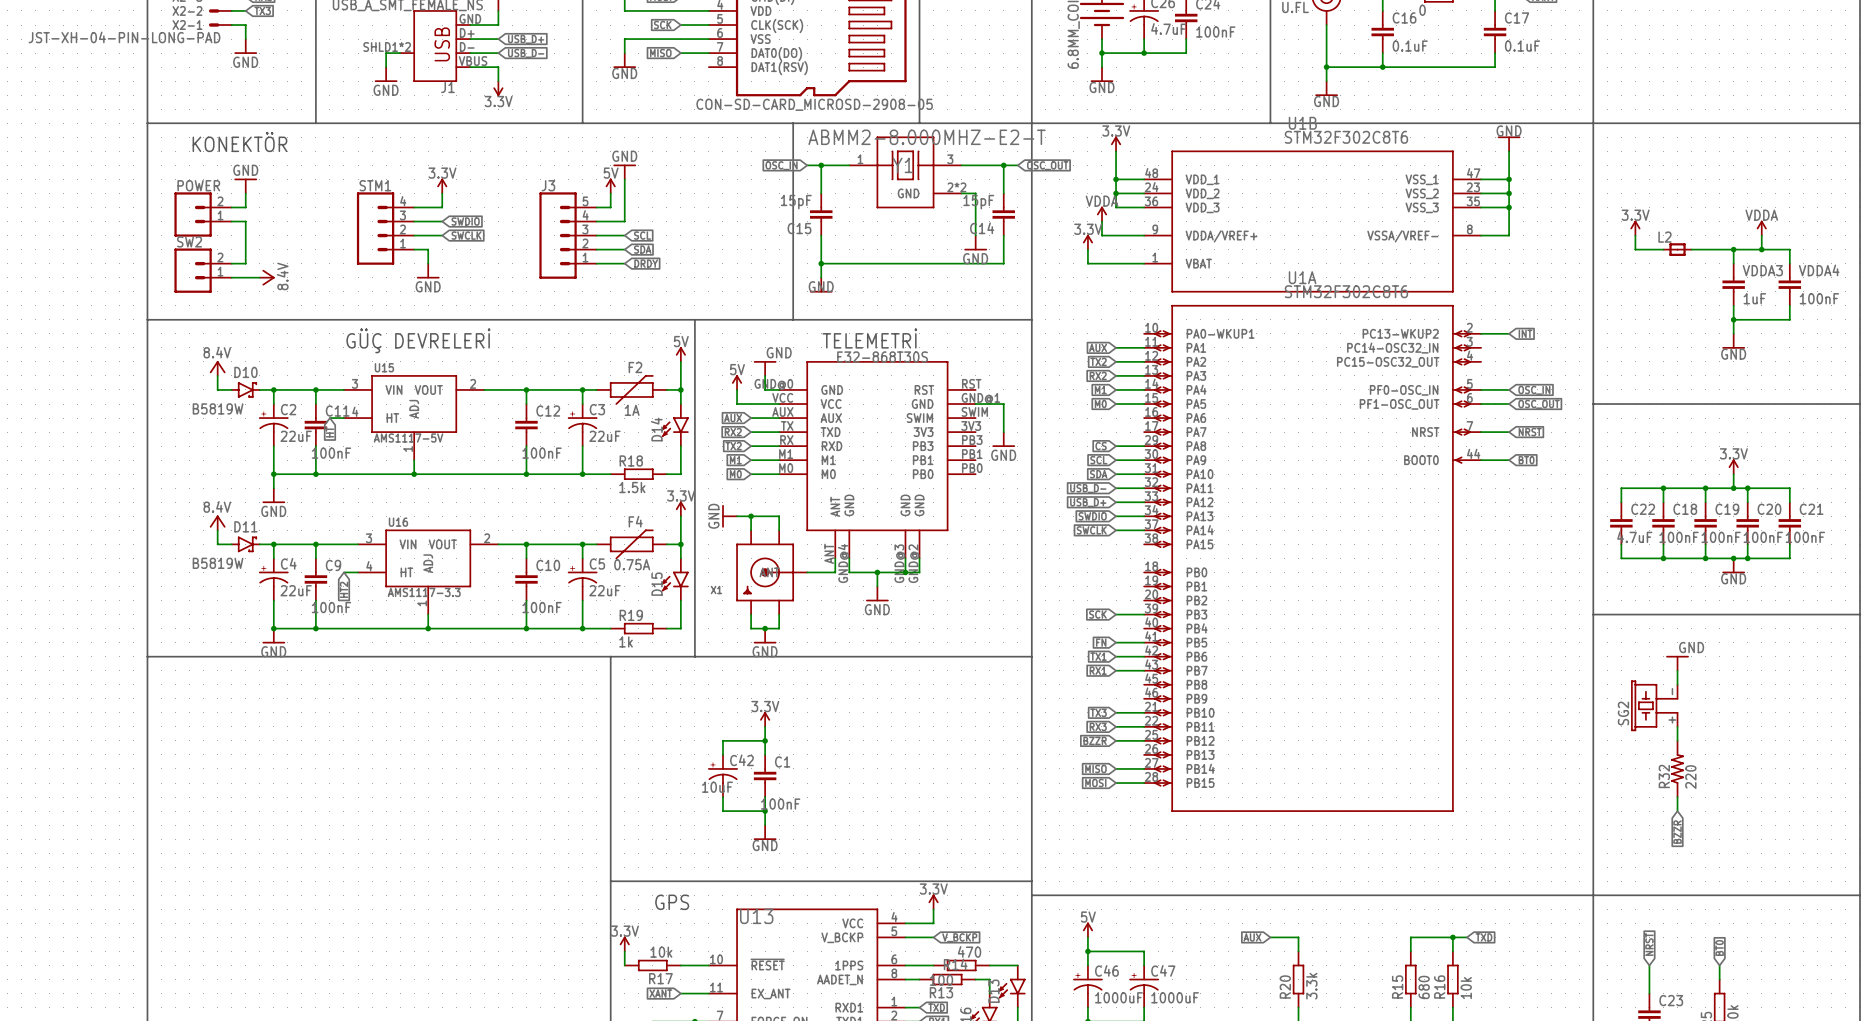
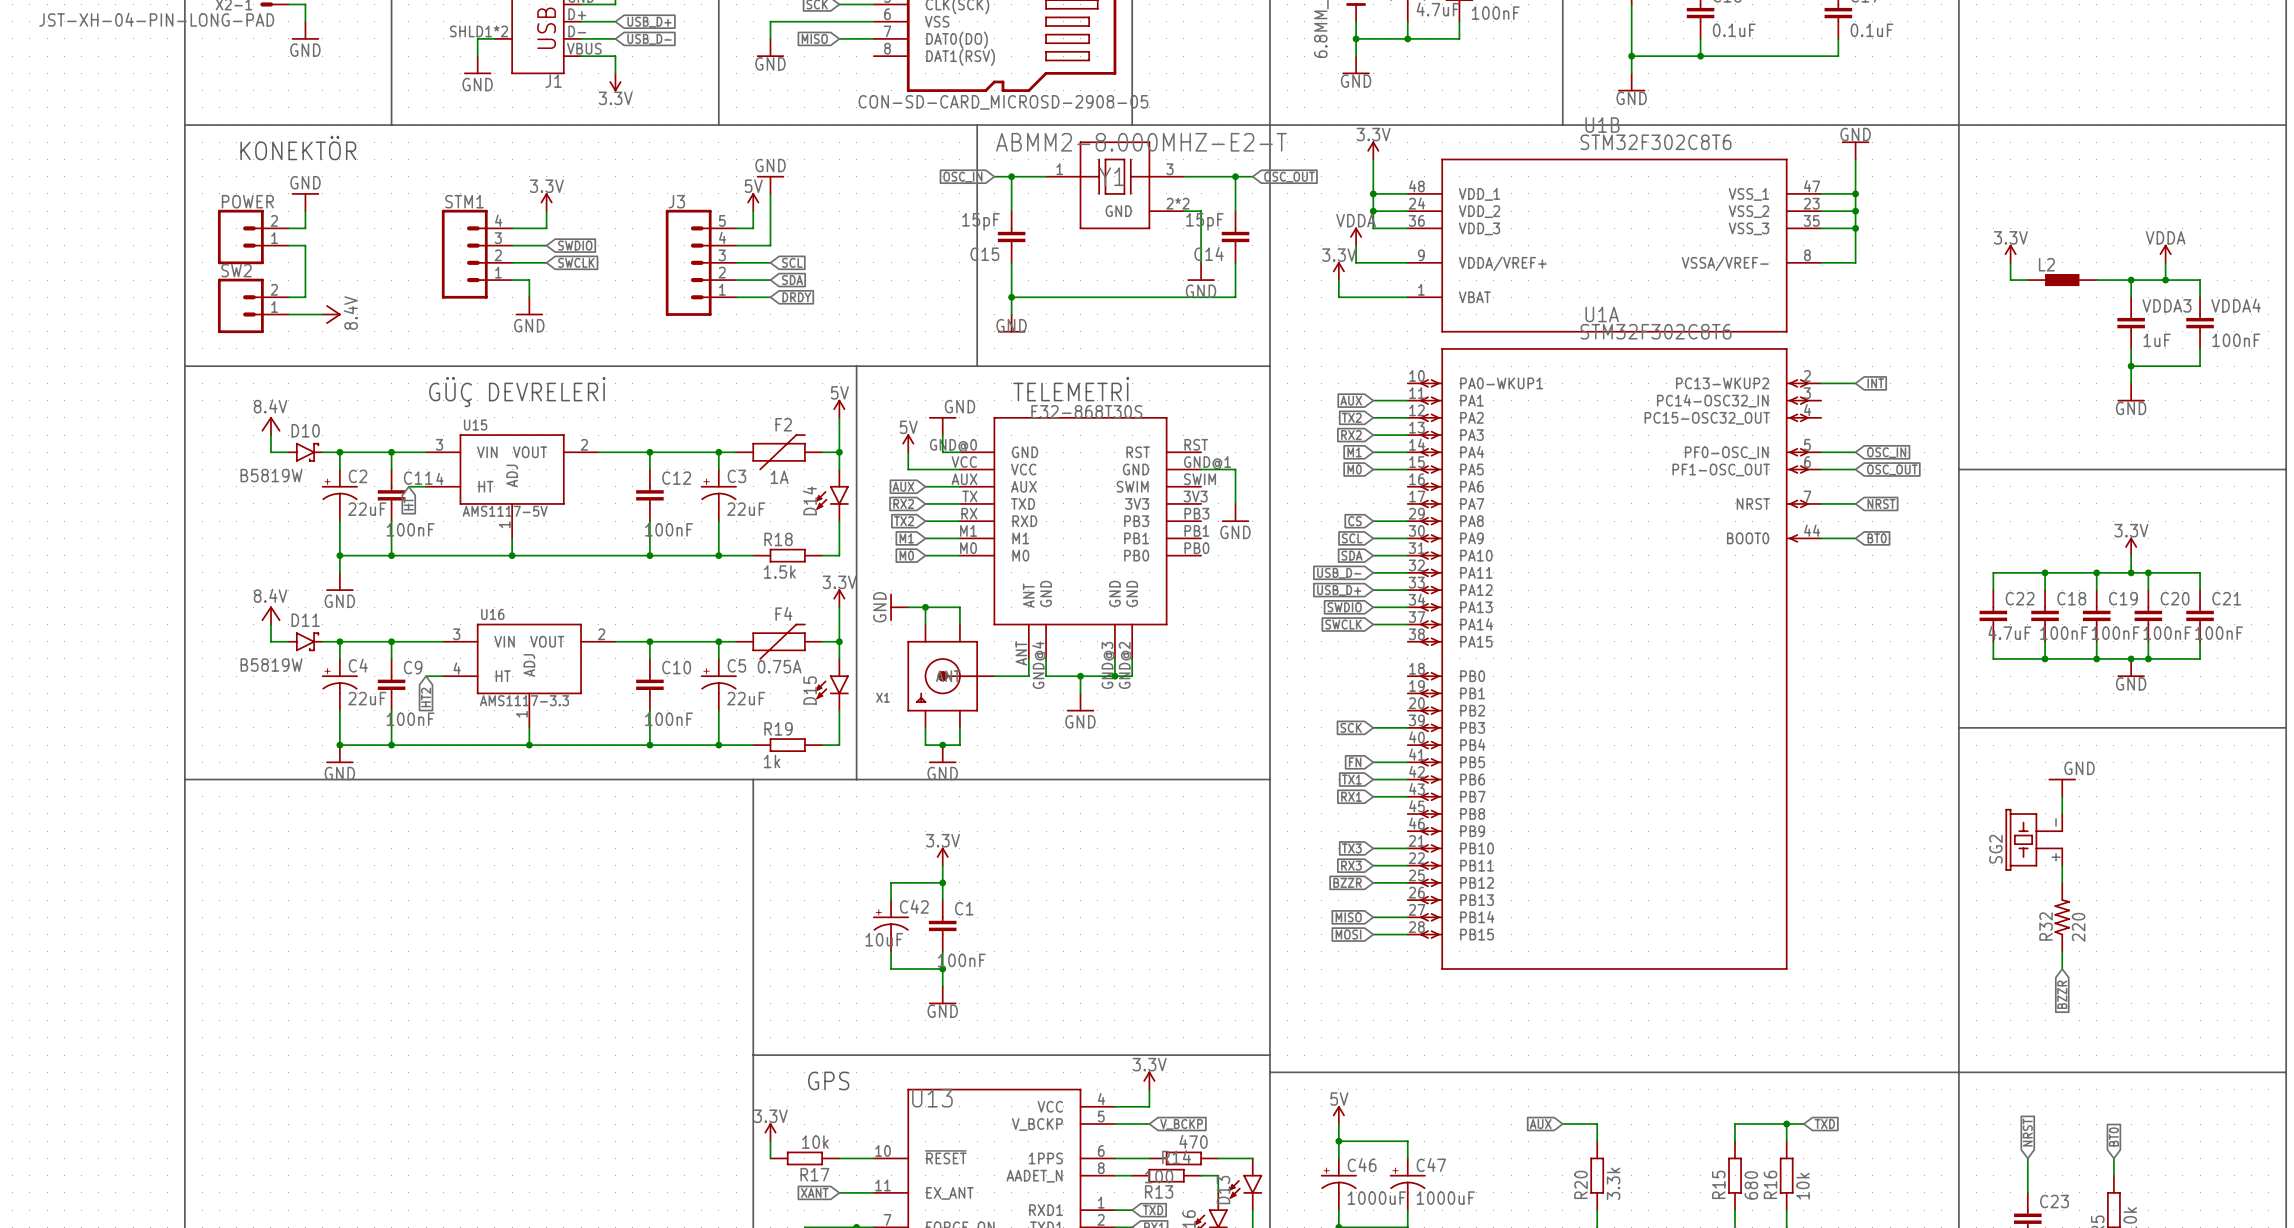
L2 symbol: [1663, 243, 1692, 256] -> [2027, 274, 2097, 287]

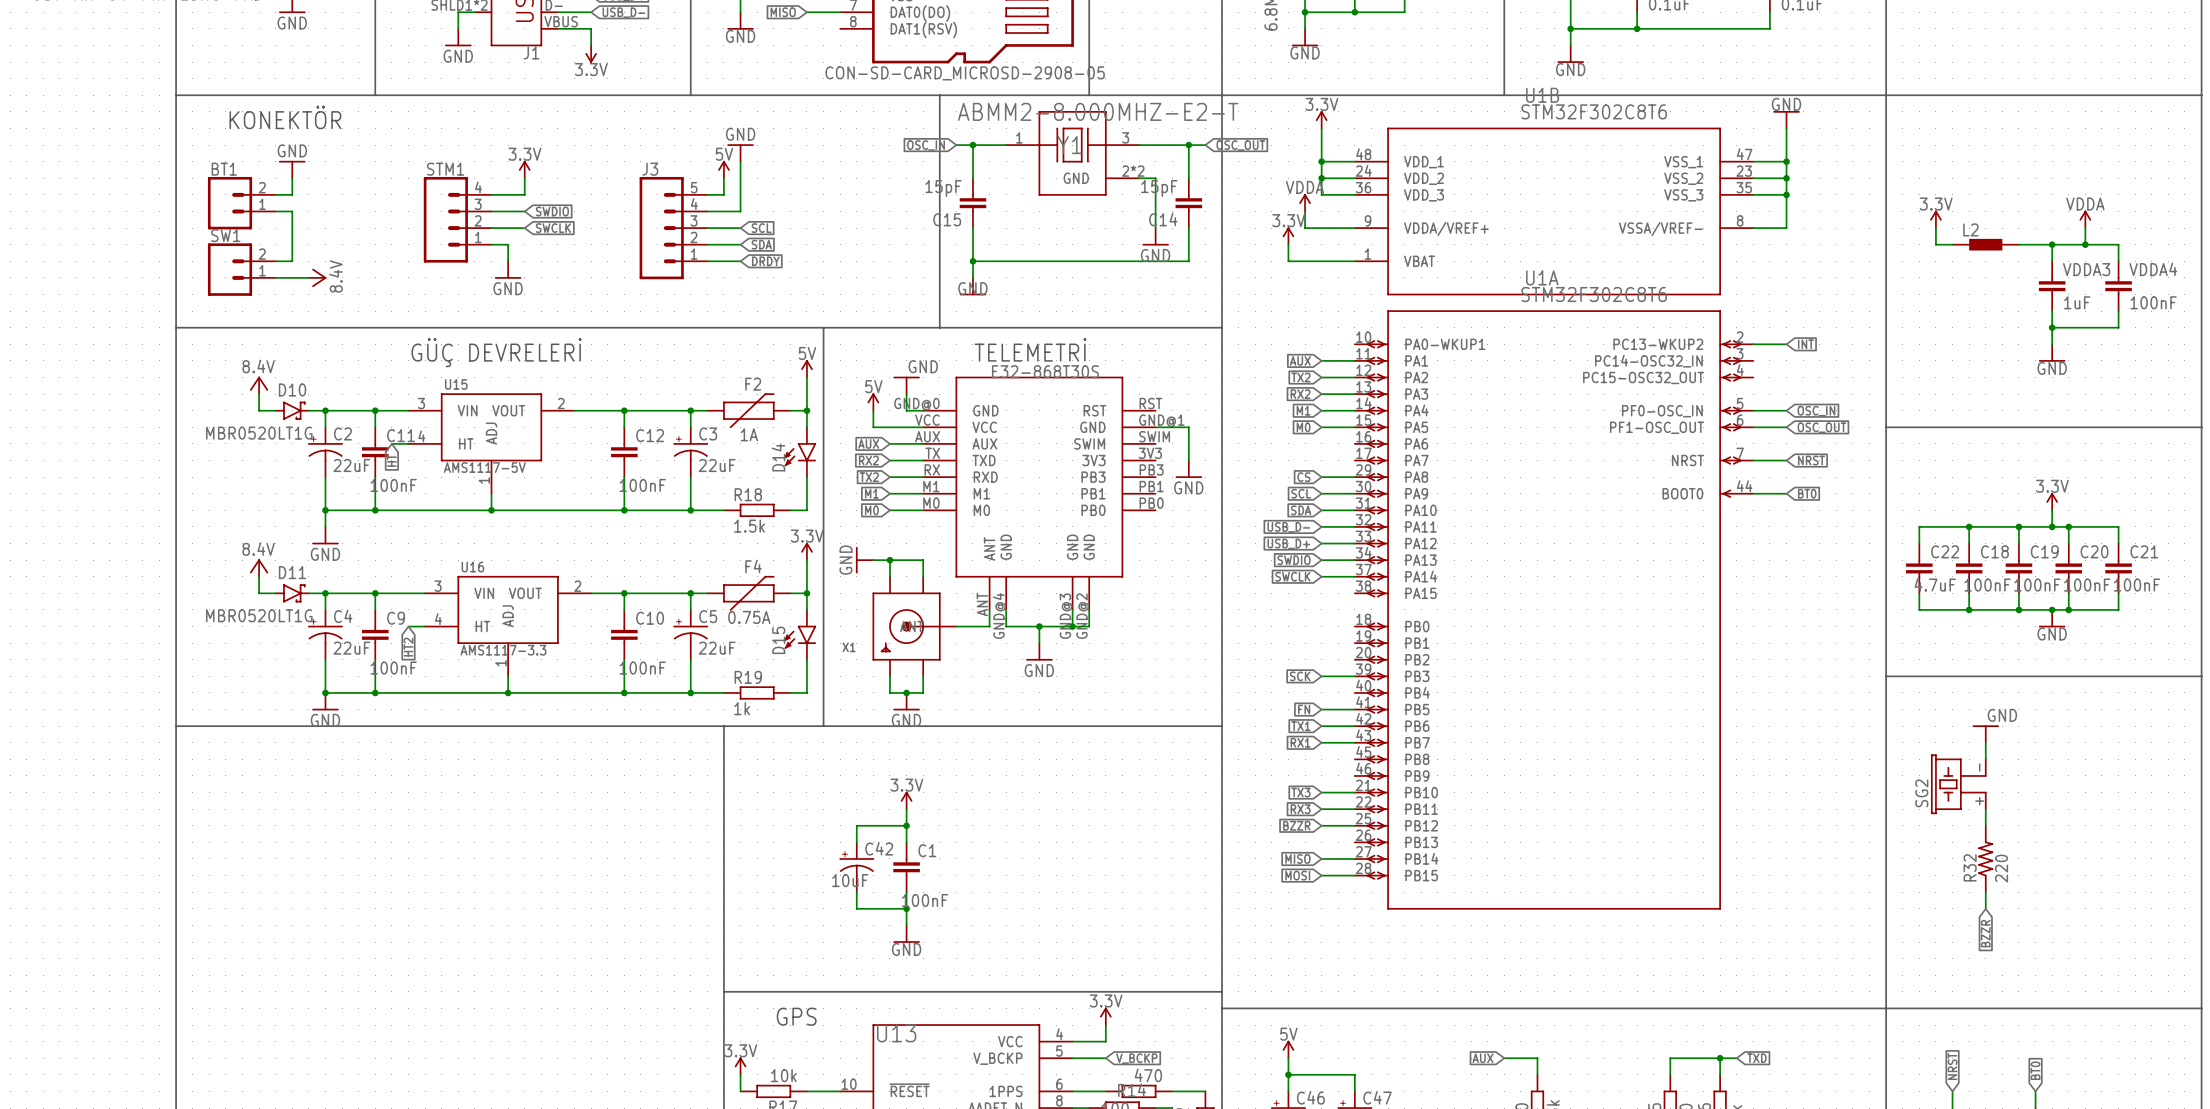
POWER name: POWER (247, 201) -> BT1 (224, 169)
SW2 name: SW2 (236, 270) -> SW1 (225, 235)
D10 value: B5819W (271, 475) -> MBR0520LT1G (259, 433)
D11 value: B5819W (271, 665) -> MBR0520LT1G (259, 615)

